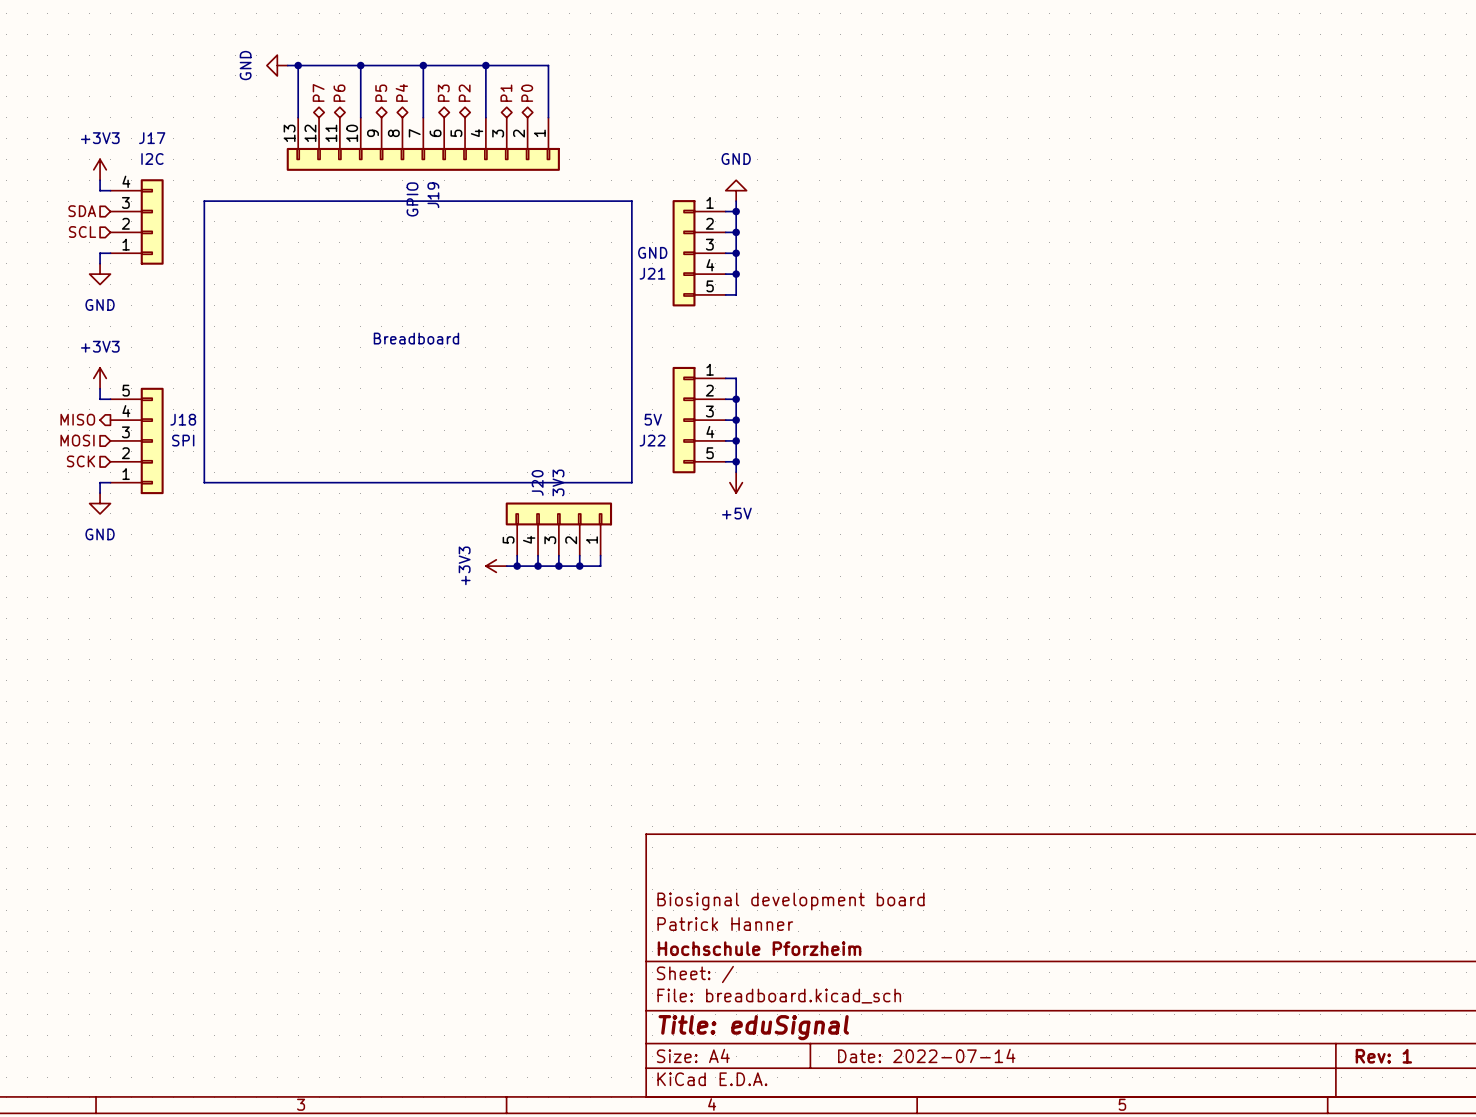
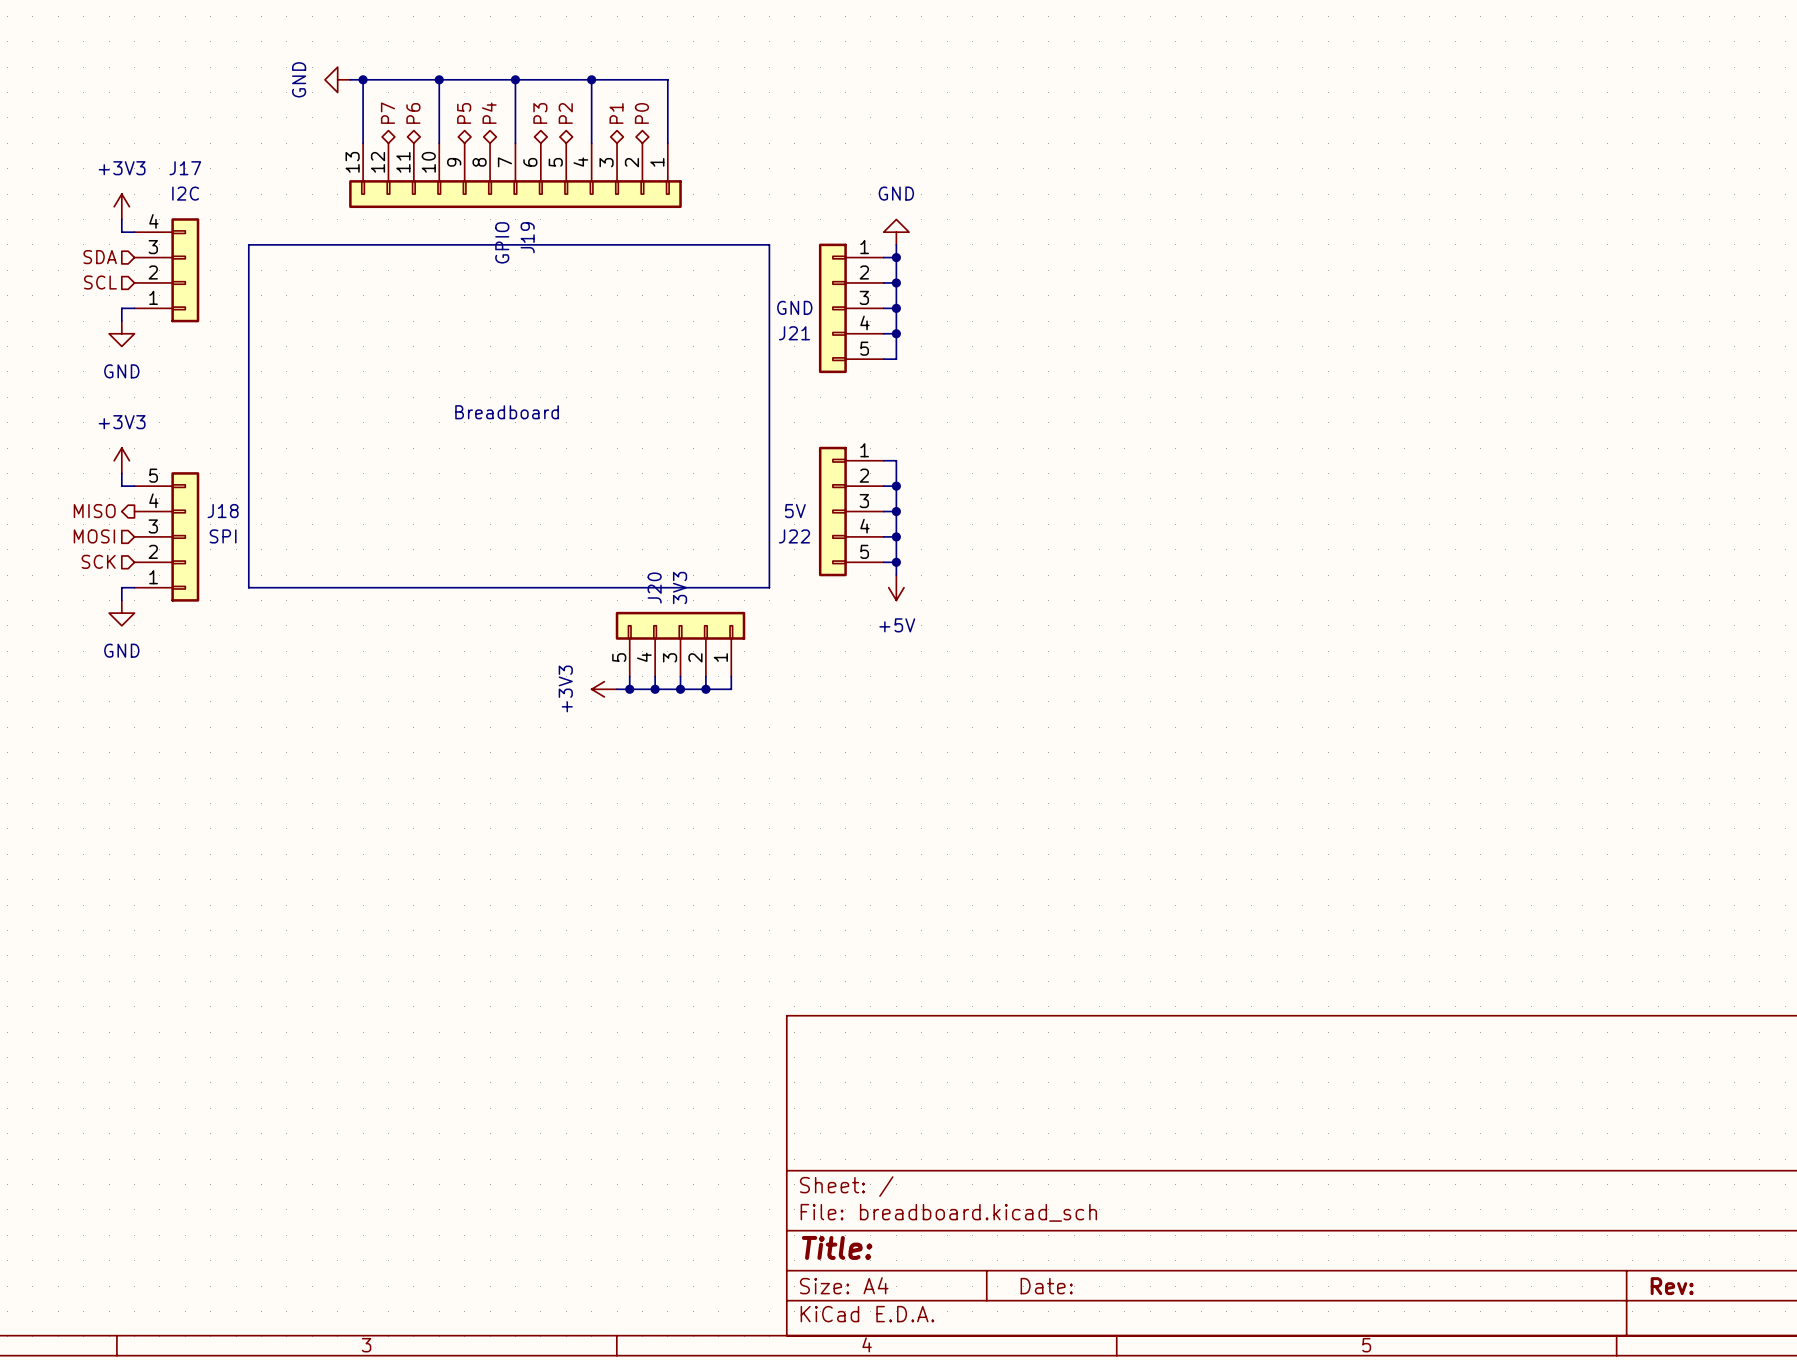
title block: Biosignal development board (790, 901) -> none
title block: Patrick Hanner (725, 924) -> none
title block: Hochschule Pforzheim (759, 948) -> none
title block: Title: eduSignal (753, 1027) -> Title: (837, 1247)
title block: Date: 2022-07-14 (926, 1055) -> Date: (1046, 1286)
title block: Rev: 1 (1383, 1056) -> Rev: (1672, 1286)

